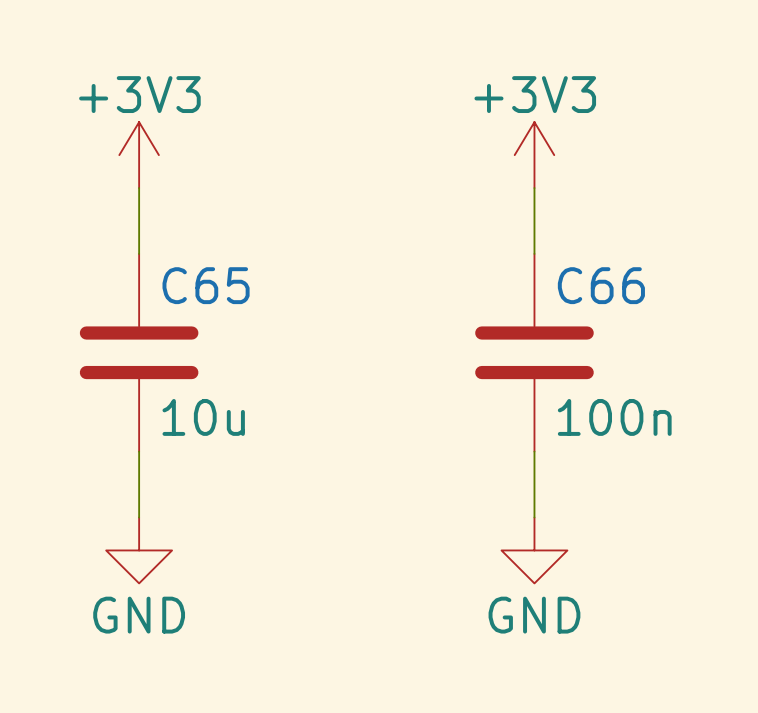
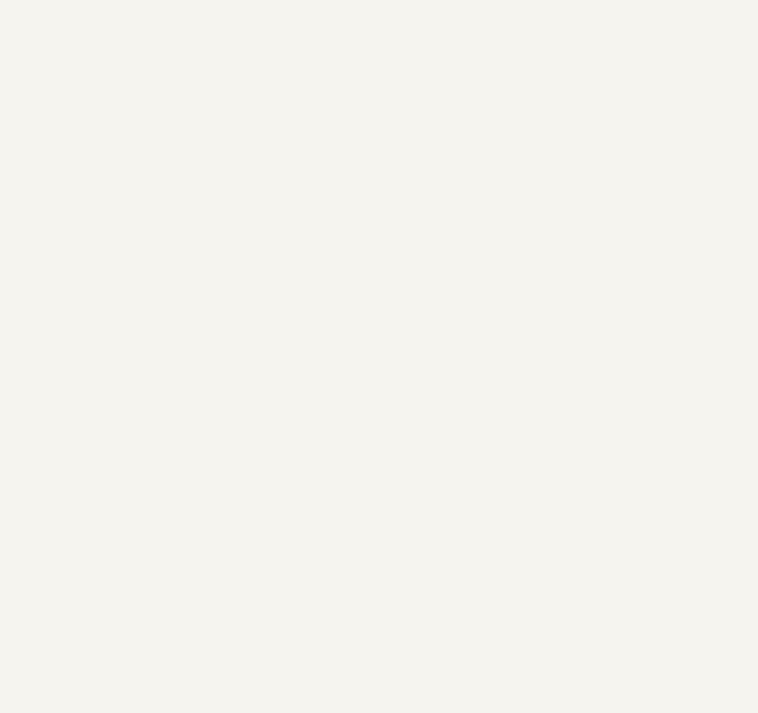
power symbol: +3V3 (139, 155) -> none
power symbol: +3V3 (534, 155) -> none
wire: (139, 188) (139, 253) -> none
wire: (534, 188) (534, 253) -> none
C65: 10u (139, 352) -> none
C66: 100n (534, 352) -> none
wire: (139, 451) (139, 517) -> none
wire: (534, 451) (534, 517) -> none
power symbol: GND (139, 550) -> none
power symbol: GND (534, 550) -> none

